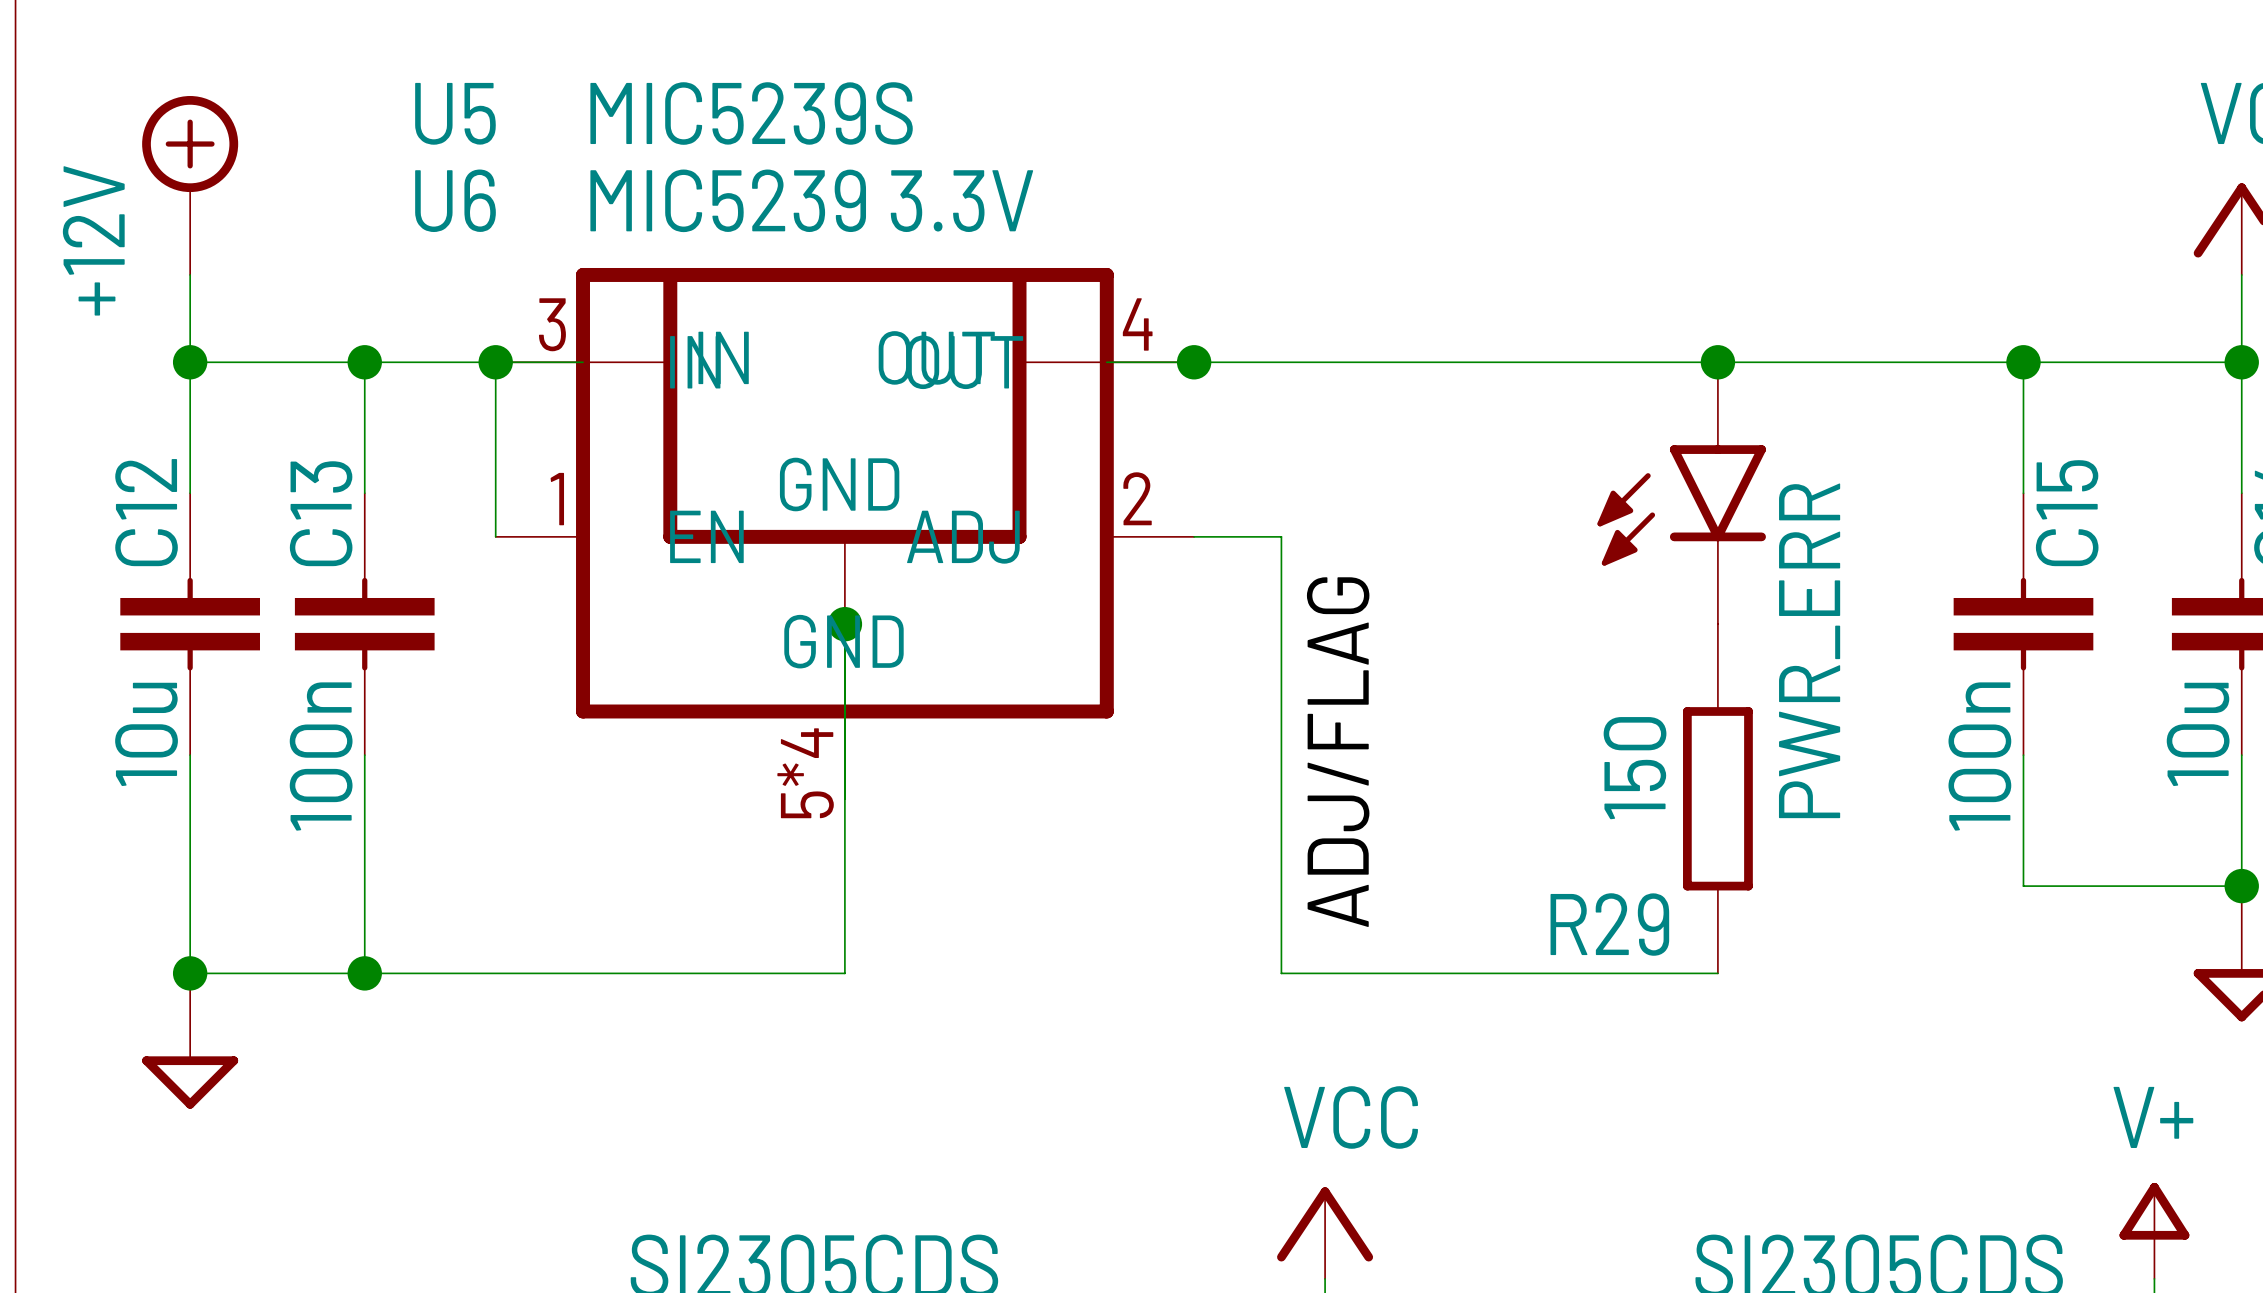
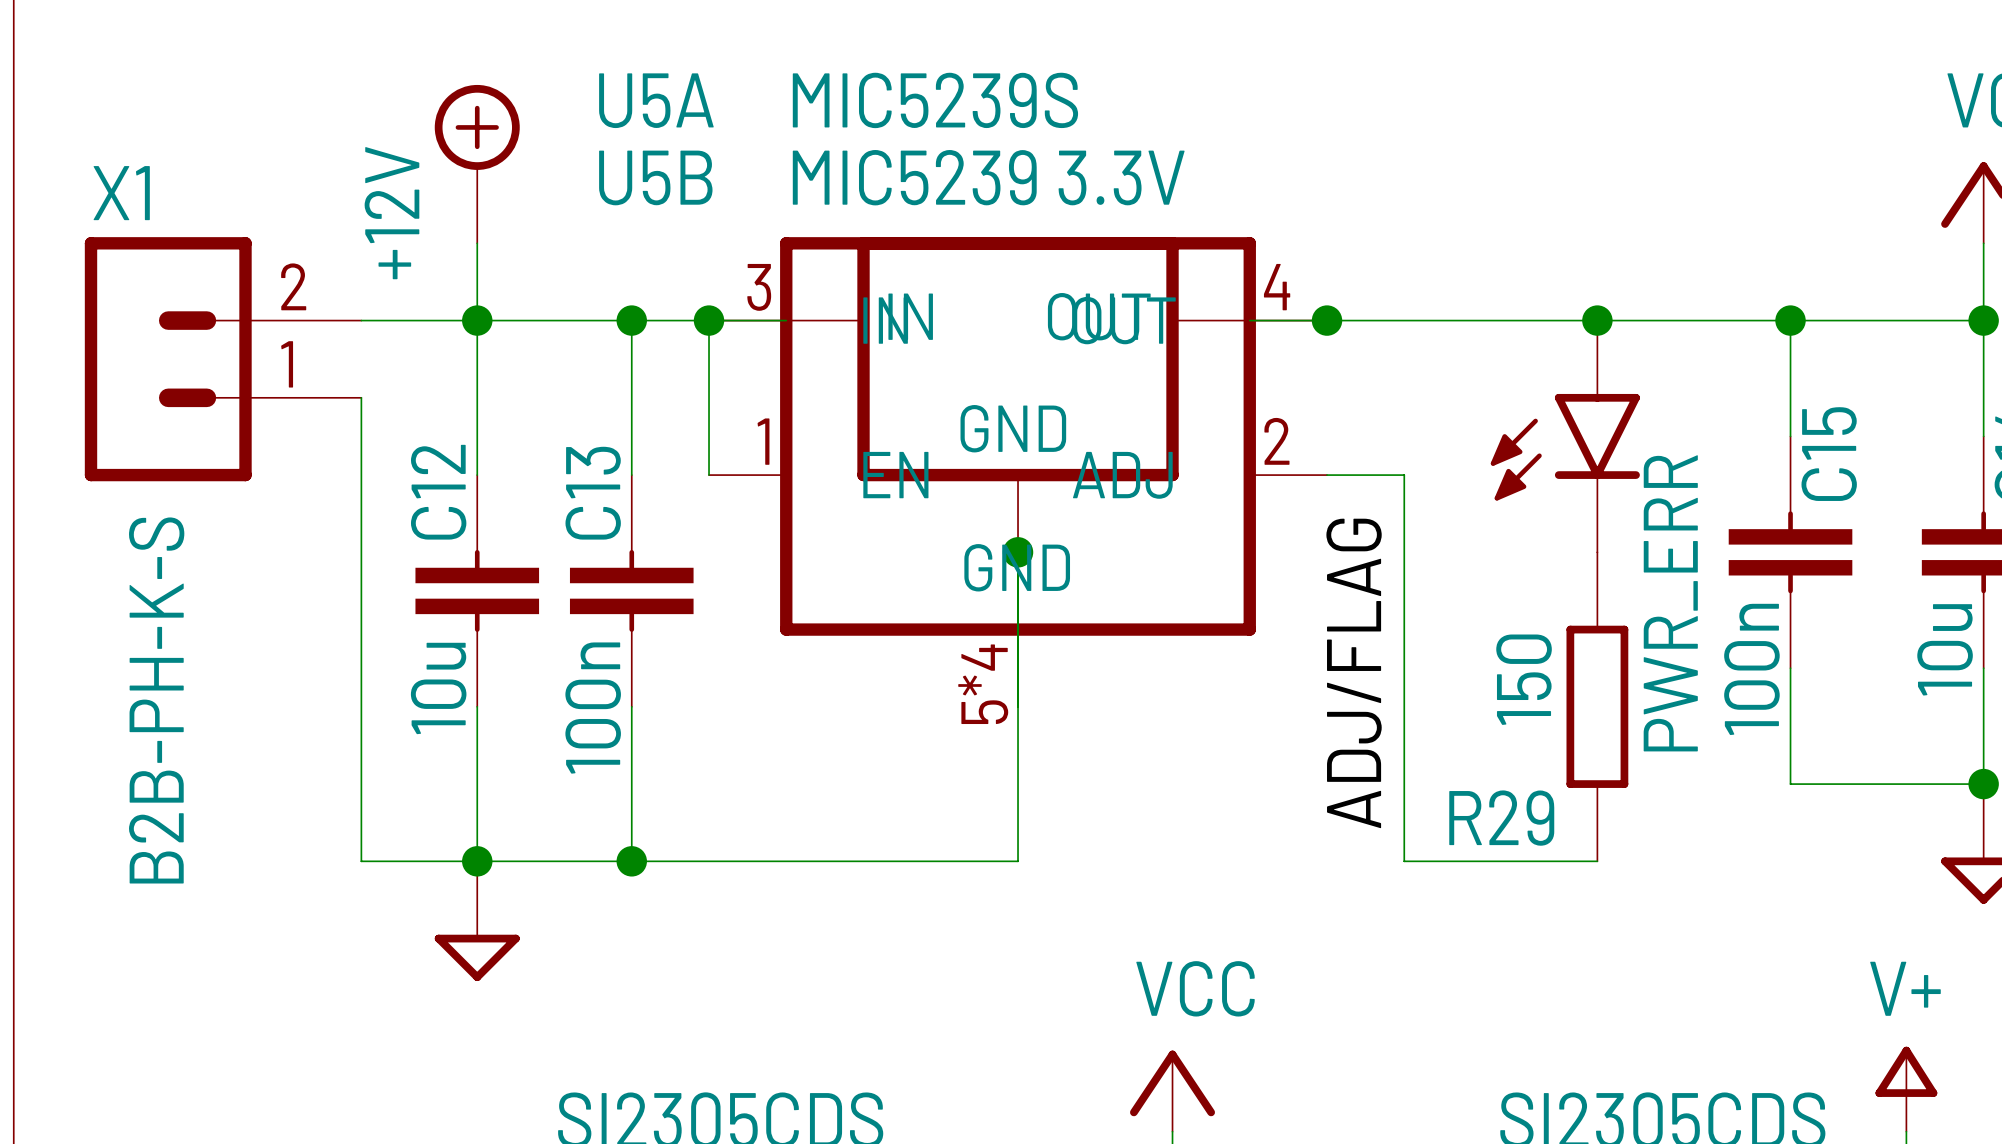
power symbol position: +12V (190, 185) -> +12V (477, 164)
wire: (190, 274) (190, 493) -> none
wire: none -> (477, 243) (477, 475)
junction: (190, 362) -> none
wire: (364, 362) (364, 493) -> none
junction: (364, 362) -> none
wire: (495, 362) (495, 536) -> (631, 320) (631, 475)
junction position: (495, 362) -> (477, 320)
junction: none -> (631, 320)
wire: none -> (709, 320) (709, 475)
junction: none -> (709, 320)
wire: (1106, 362) (1412, 362) -> (515, 320) (786, 320)
junction: (1194, 362) -> none
junction: none -> (1327, 320)
junction position: (1717, 362) -> (1597, 320)
X1: none -> B2B-PH-K-S (223, 359)
U6: MIC5239S (844, 446) -> none
U5B: none -> MIC5239S (1018, 394)
PWR_ERR position: (1681, 493) -> (1565, 436)
U5: MIC5239 3.3V (844, 533) -> none
U5A: none -> MIC5239 3.3V (1018, 471)
wire: (1194, 536) (1281, 536) (1281, 973) (1586, 973) -> (1327, 475) (1404, 475) (1404, 861)
C12 position: (190, 624) -> (477, 590)
C13 position: (364, 624) -> (631, 590)
wire: (844, 624) (844, 973) -> (1018, 552) (1018, 861) (747, 861)
junction: (844, 624) -> none
junction: none -> (1018, 552)
PWR_ERR name position: PWR_ERR (1809, 650) -> PWR_ERR (1670, 603)
label position: ADJ/FLAG (1338, 752) -> ADJ/FLAG (1354, 673)
wire: (190, 755) (190, 973) (408, 973) -> (361, 397) (361, 861)
wire: (364, 755) (364, 973) -> none
wire: none -> (477, 706) (477, 861)
wire: none -> (631, 706) (631, 861)
R29 position: (1717, 798) -> (1597, 706)
junction: (190, 973) -> none
junction: (364, 973) -> none
junction: none -> (477, 861)
junction: none -> (631, 861)
wire: none -> (1520, 861) (1597, 861)
power symbol position: (190, 1041) -> (477, 921)

